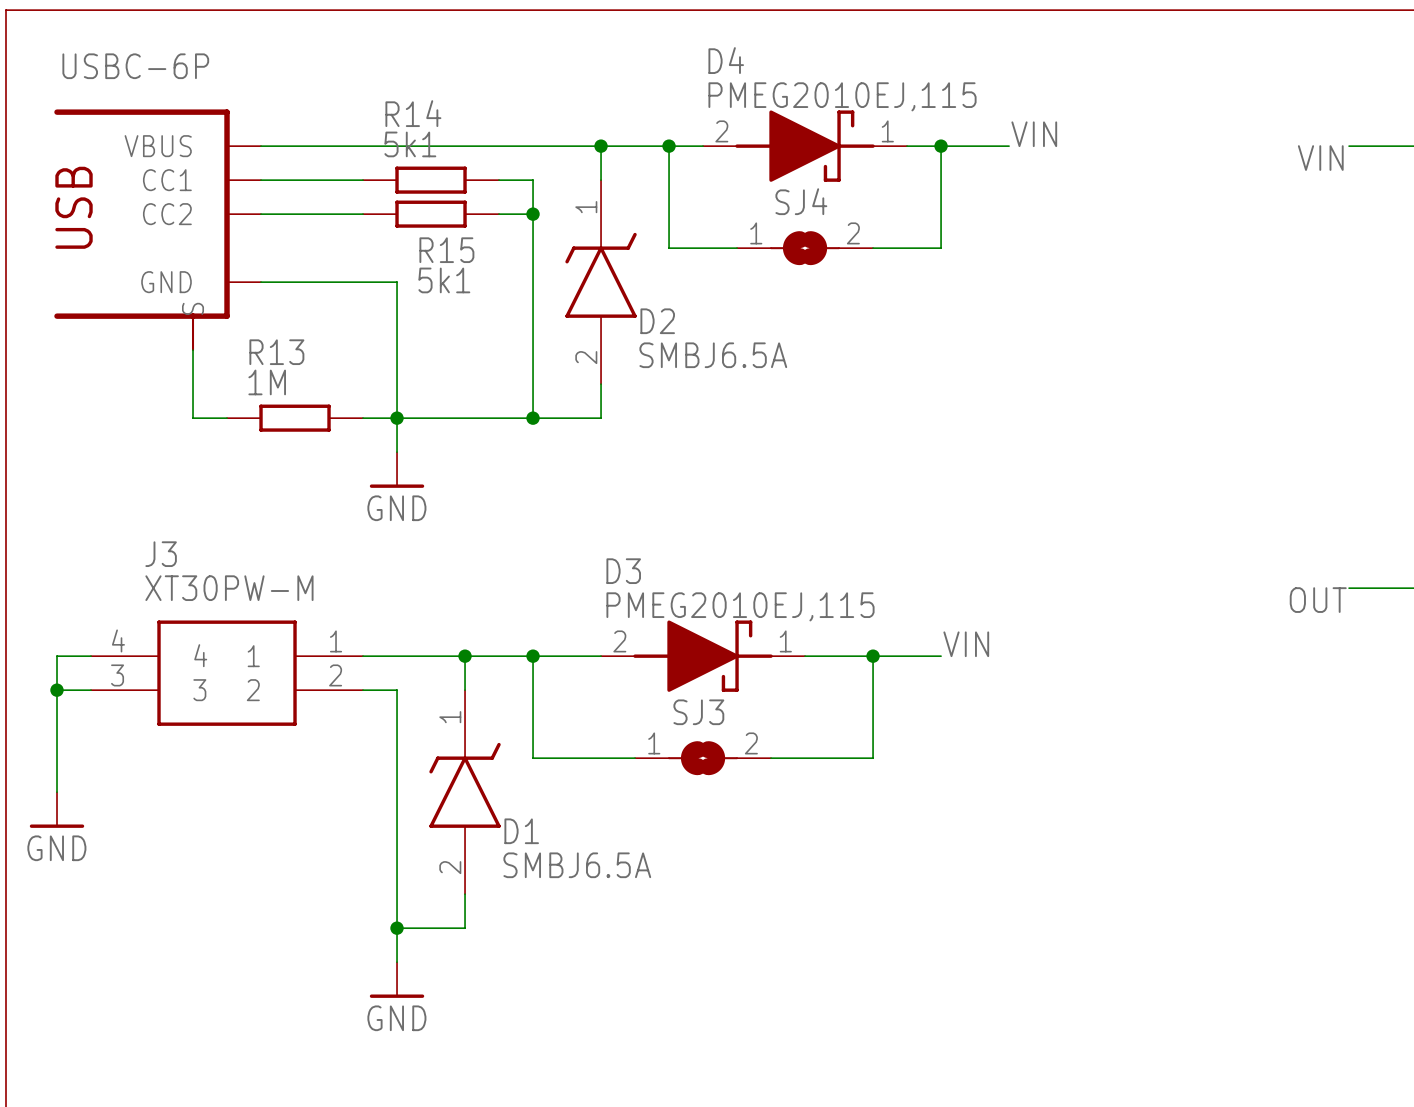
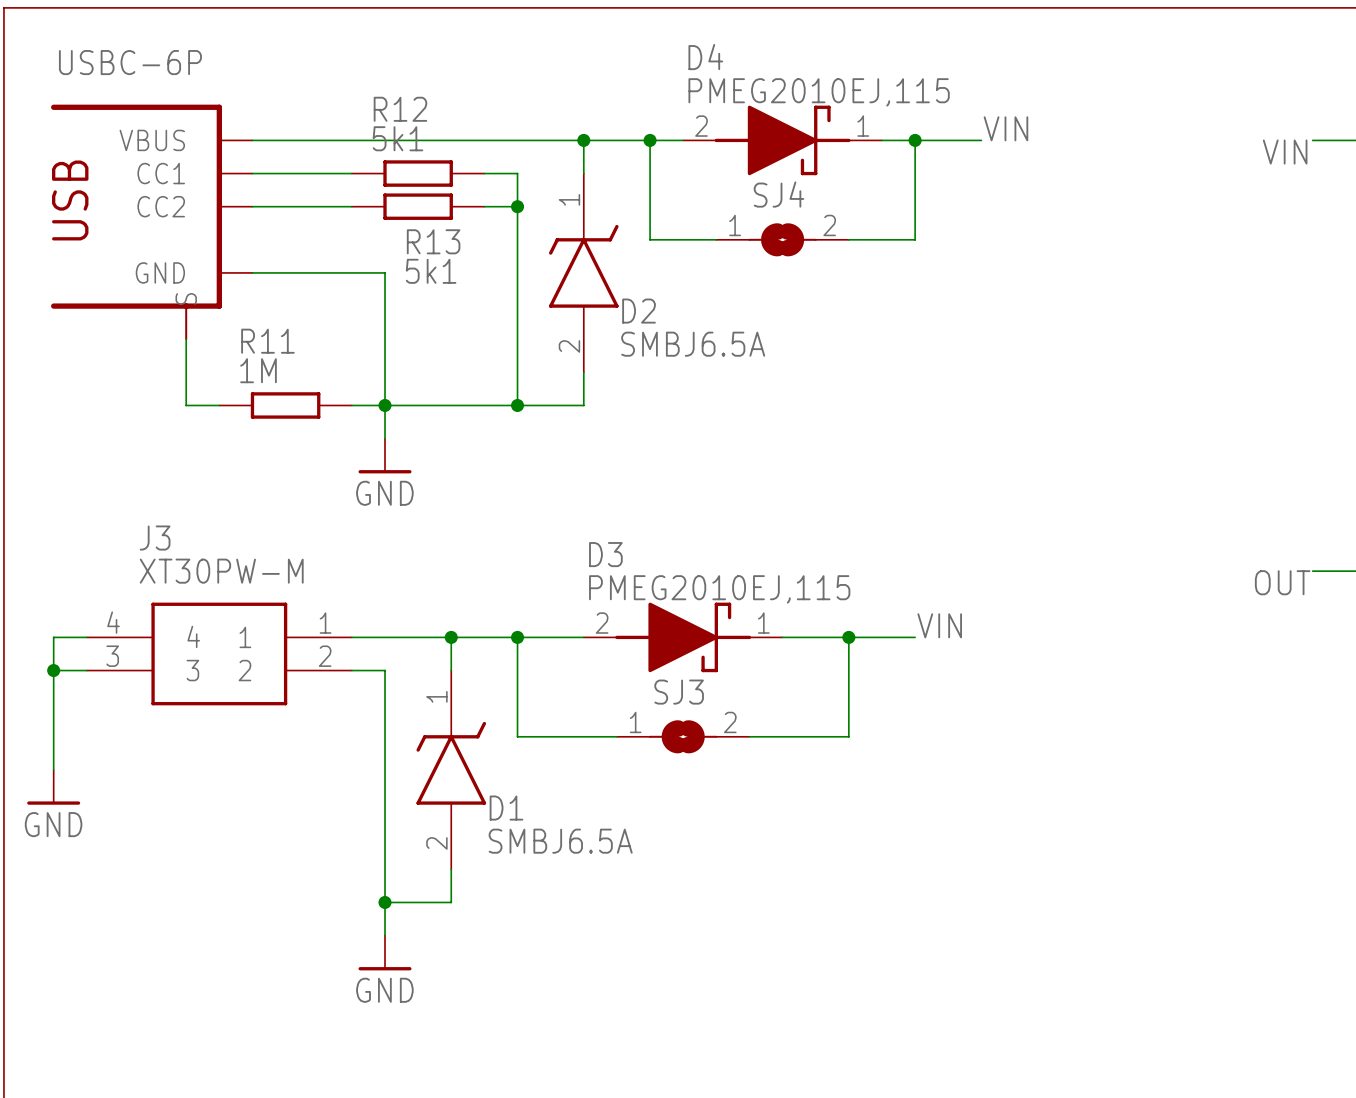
R14 name: R14 (413, 113) -> R12 (400, 109)
R15 name: R15 (446, 250) -> R13 (433, 241)
R13 name: R13 (276, 352) -> R11 (267, 341)

